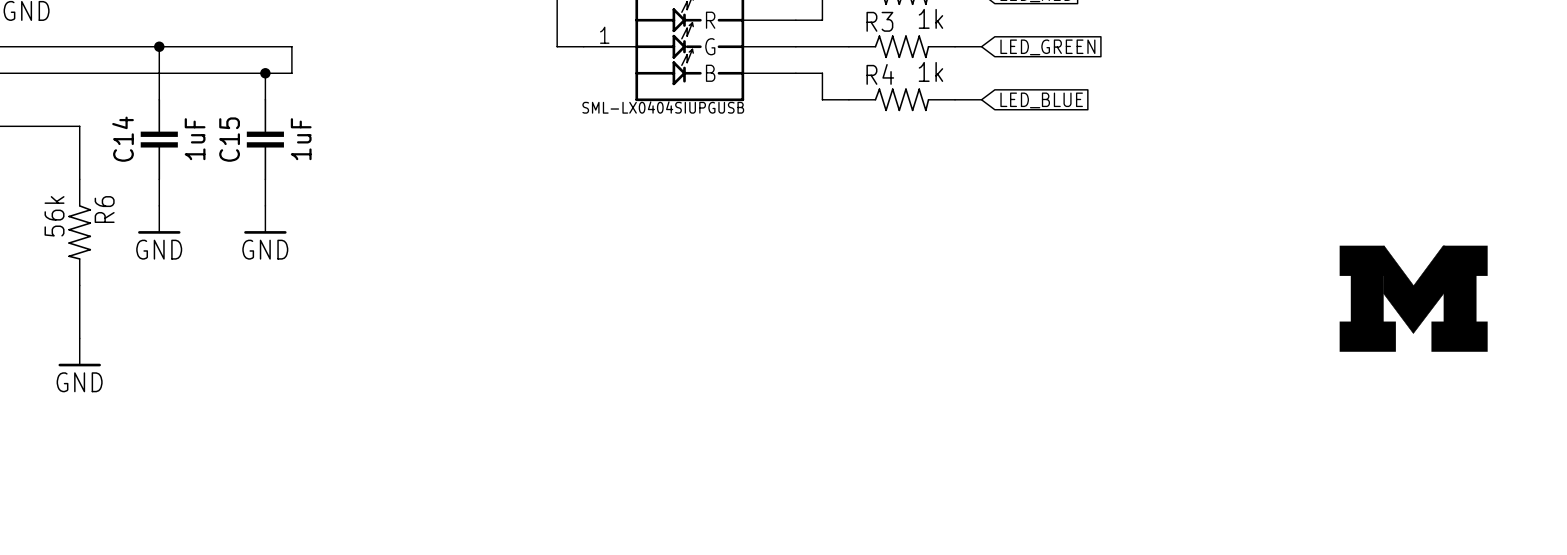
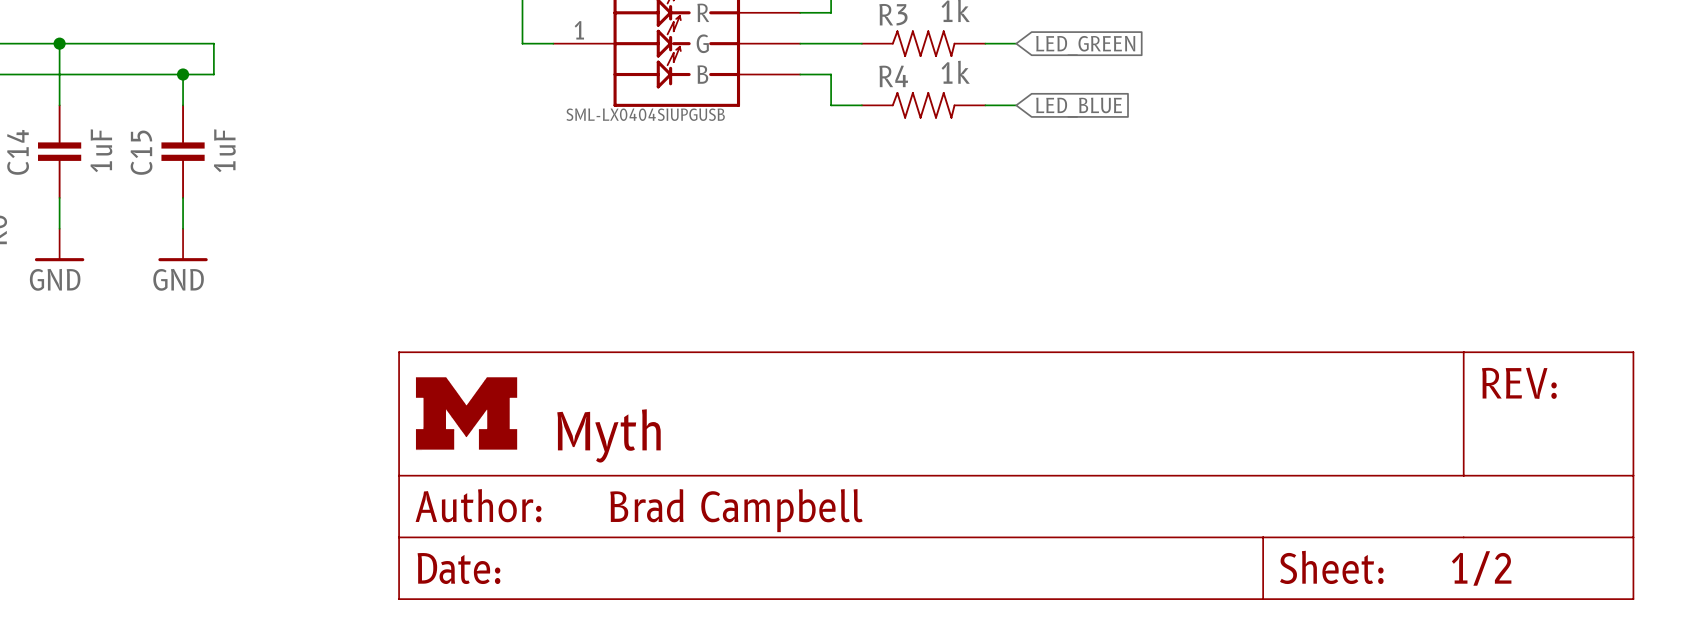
part: (1413, 298) -> none
part: none -> (1016, 475)

